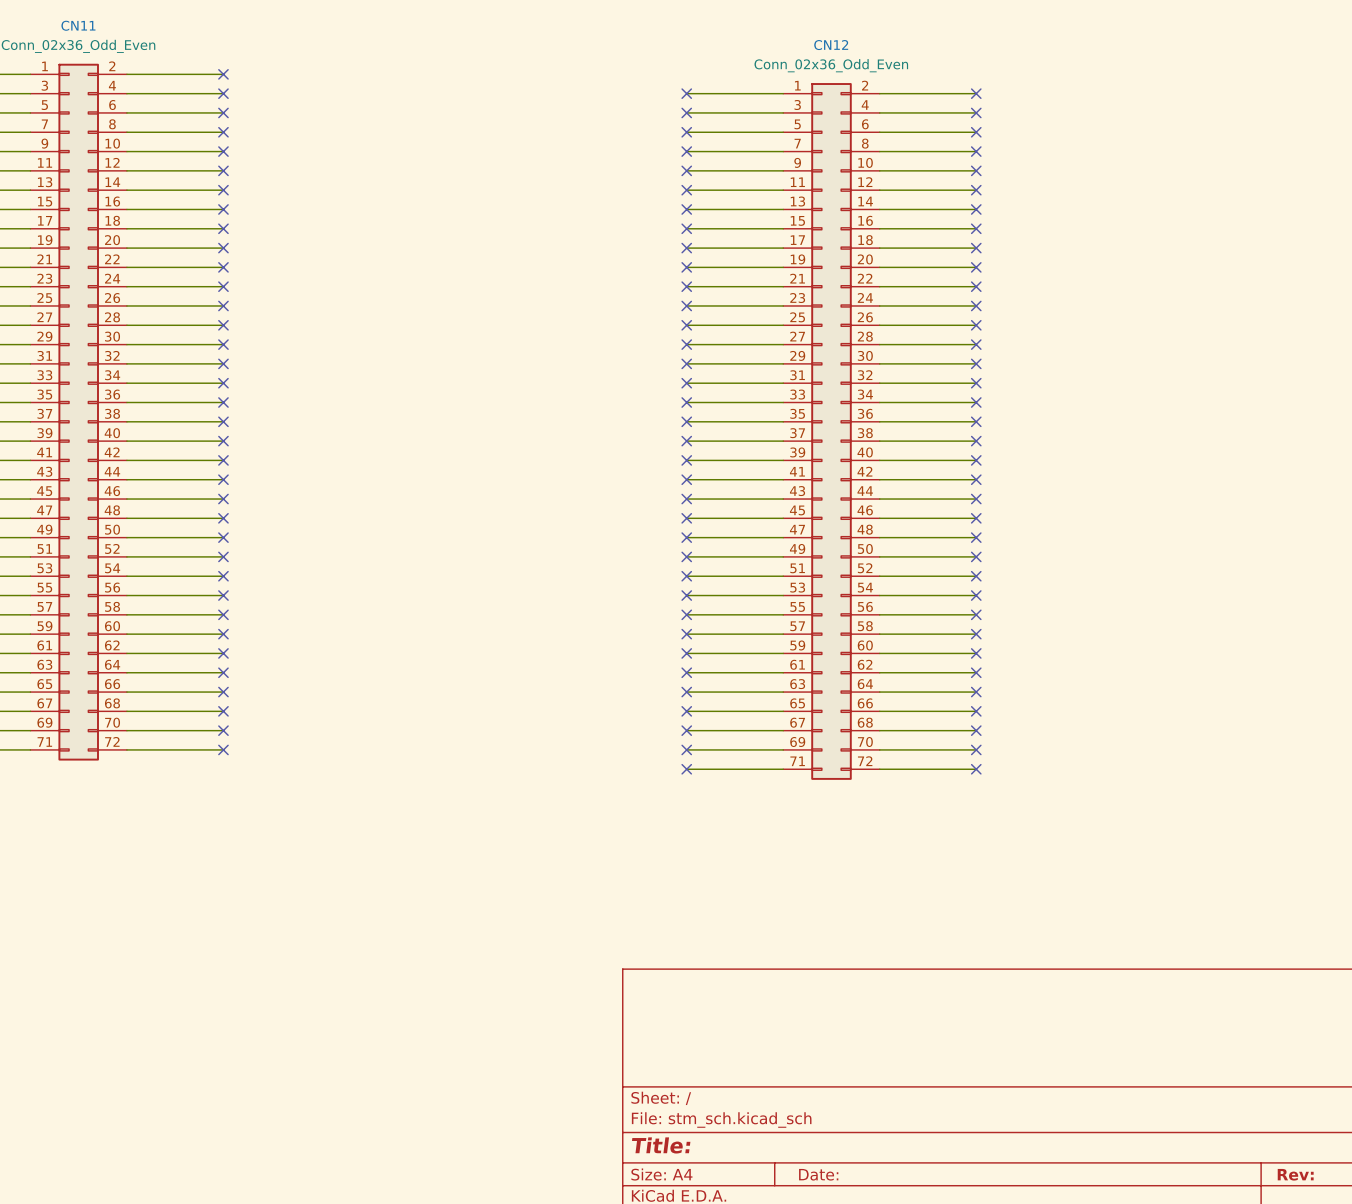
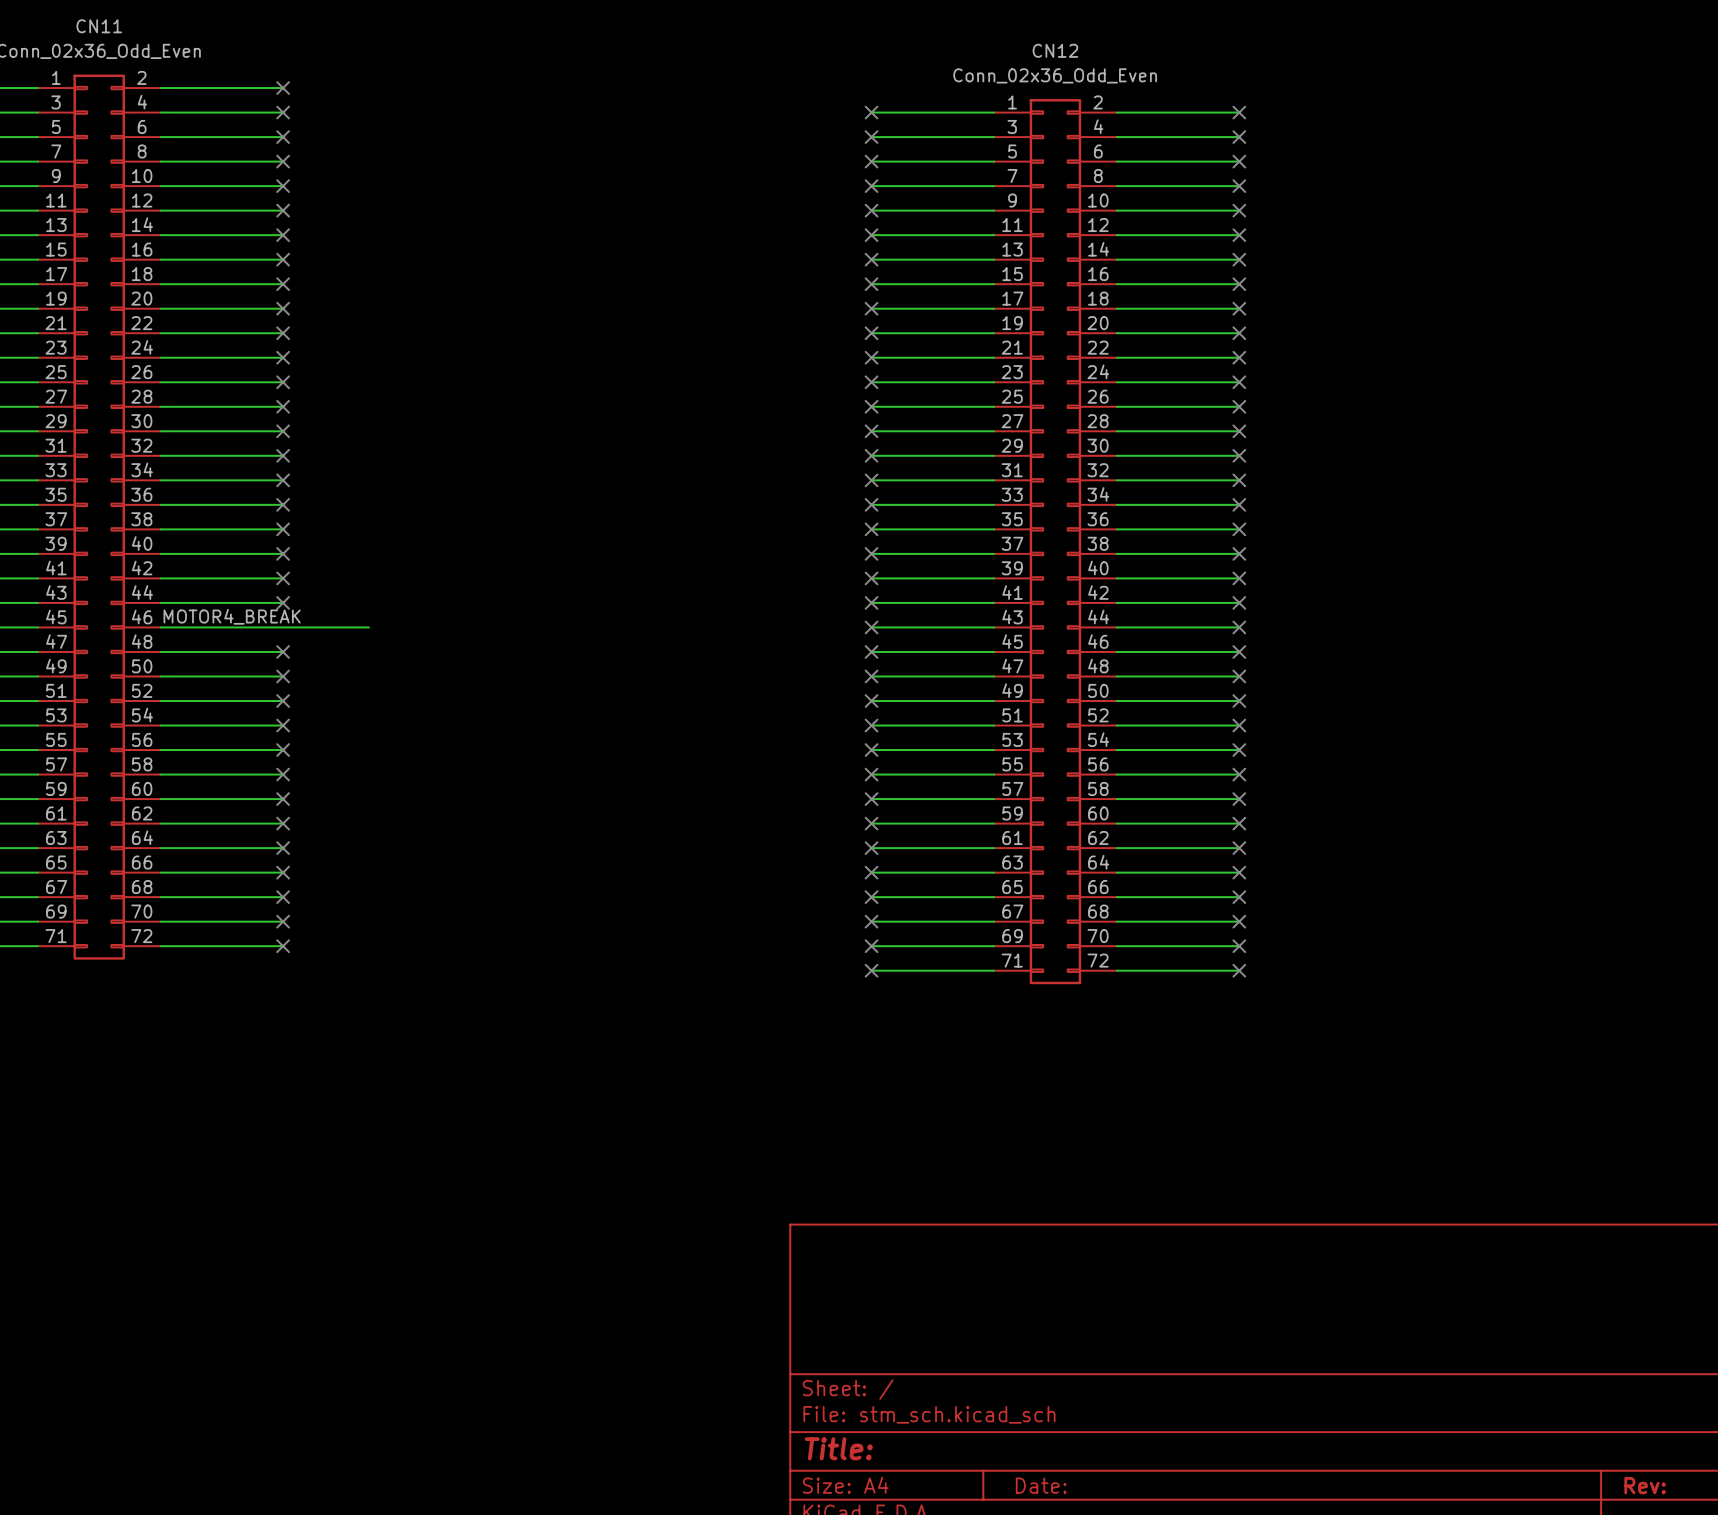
label: none -> MOTOR4_BREAK (232, 616)
wire: none -> (283, 627) (368, 627)
no-connect mark: (223, 499) -> none

